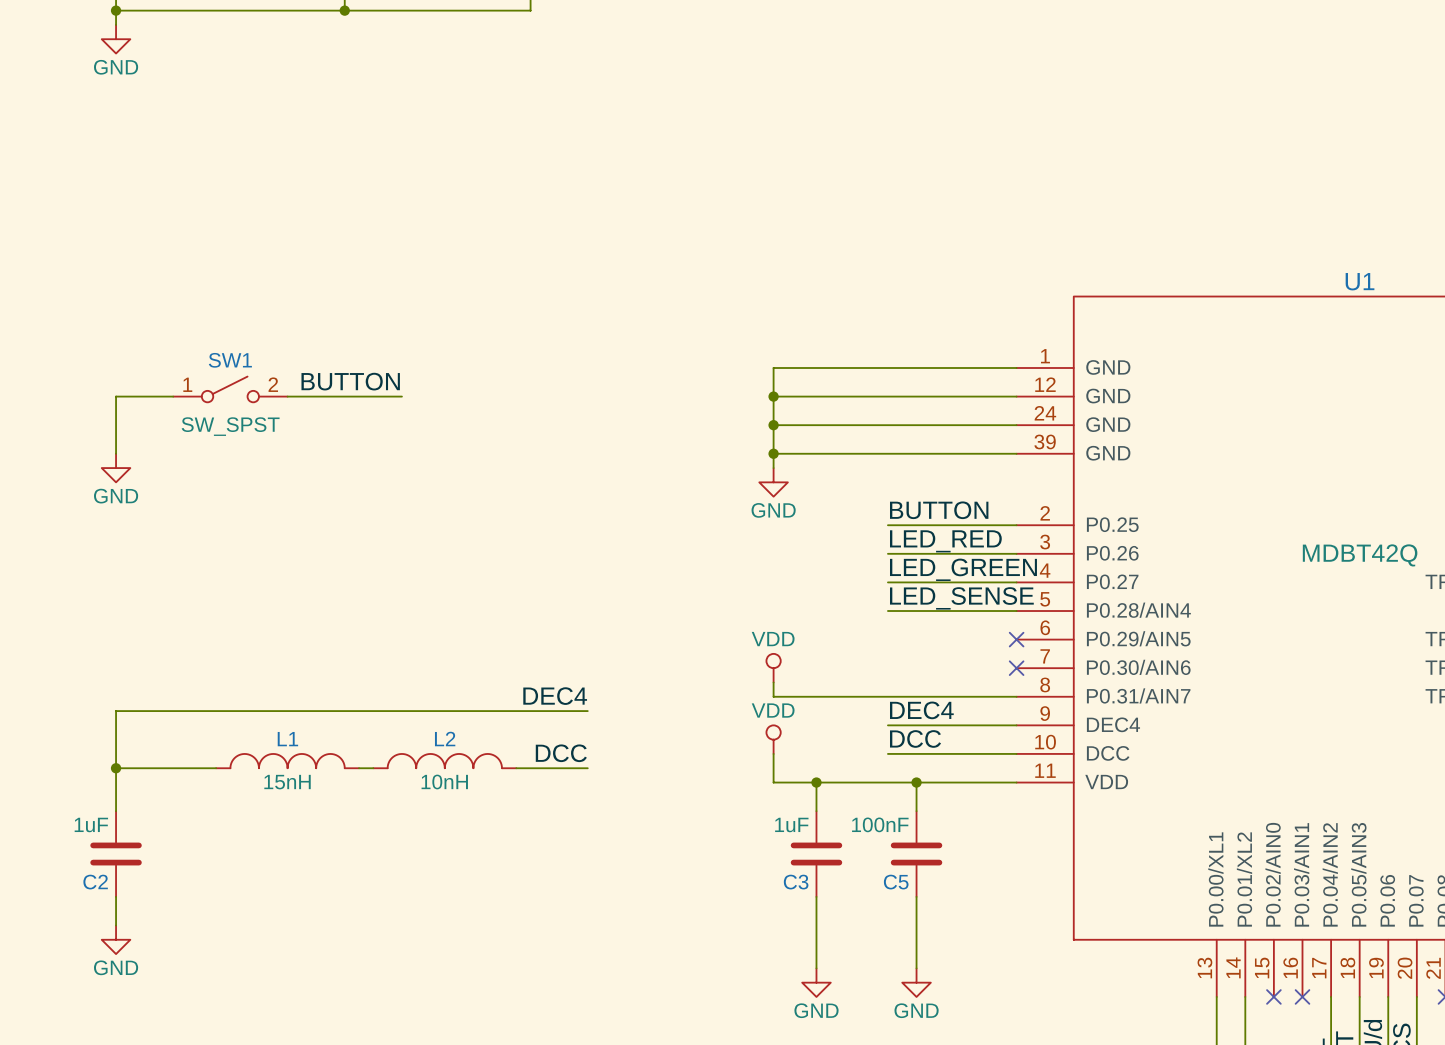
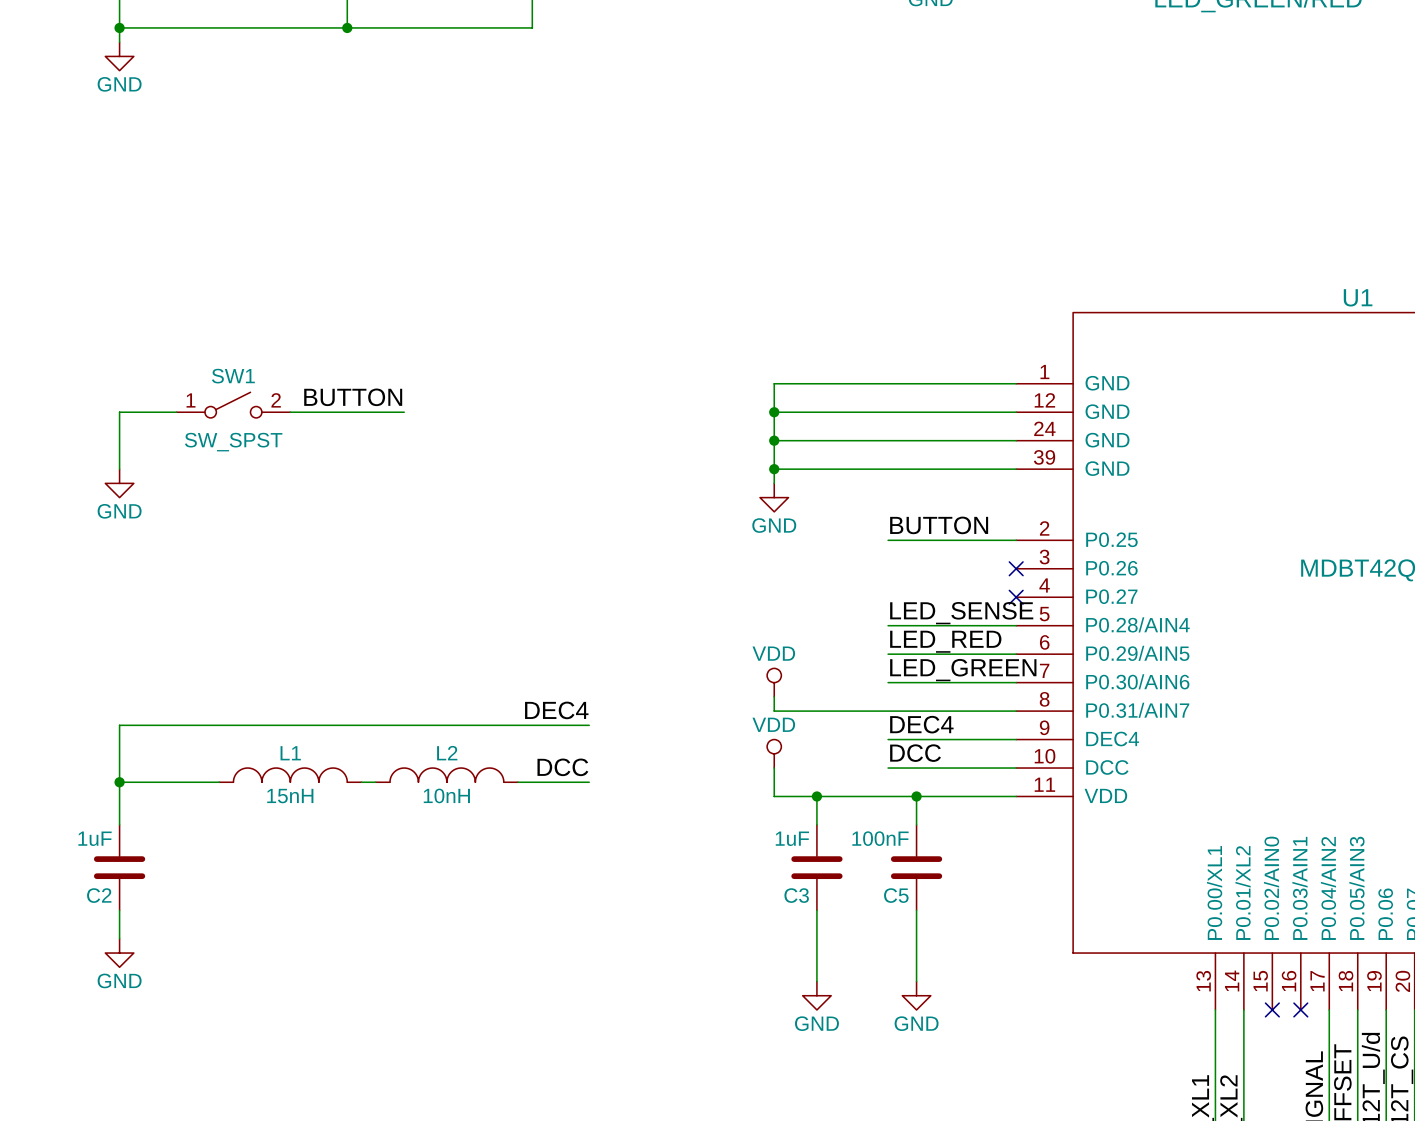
label position: LED_RED (945, 541) -> LED_RED (945, 641)
wire: (887, 553) (1016, 553) -> (888, 682) (1016, 682)
no-connect mark: none -> (1016, 568)
label position: LED_GREEN (963, 569) -> LED_GREEN (963, 670)
wire: (887, 582) (1016, 582) -> (888, 654) (1016, 654)
no-connect mark: none -> (1016, 597)
no-connect mark: (1016, 639) -> none
no-connect mark: (1016, 668) -> none

